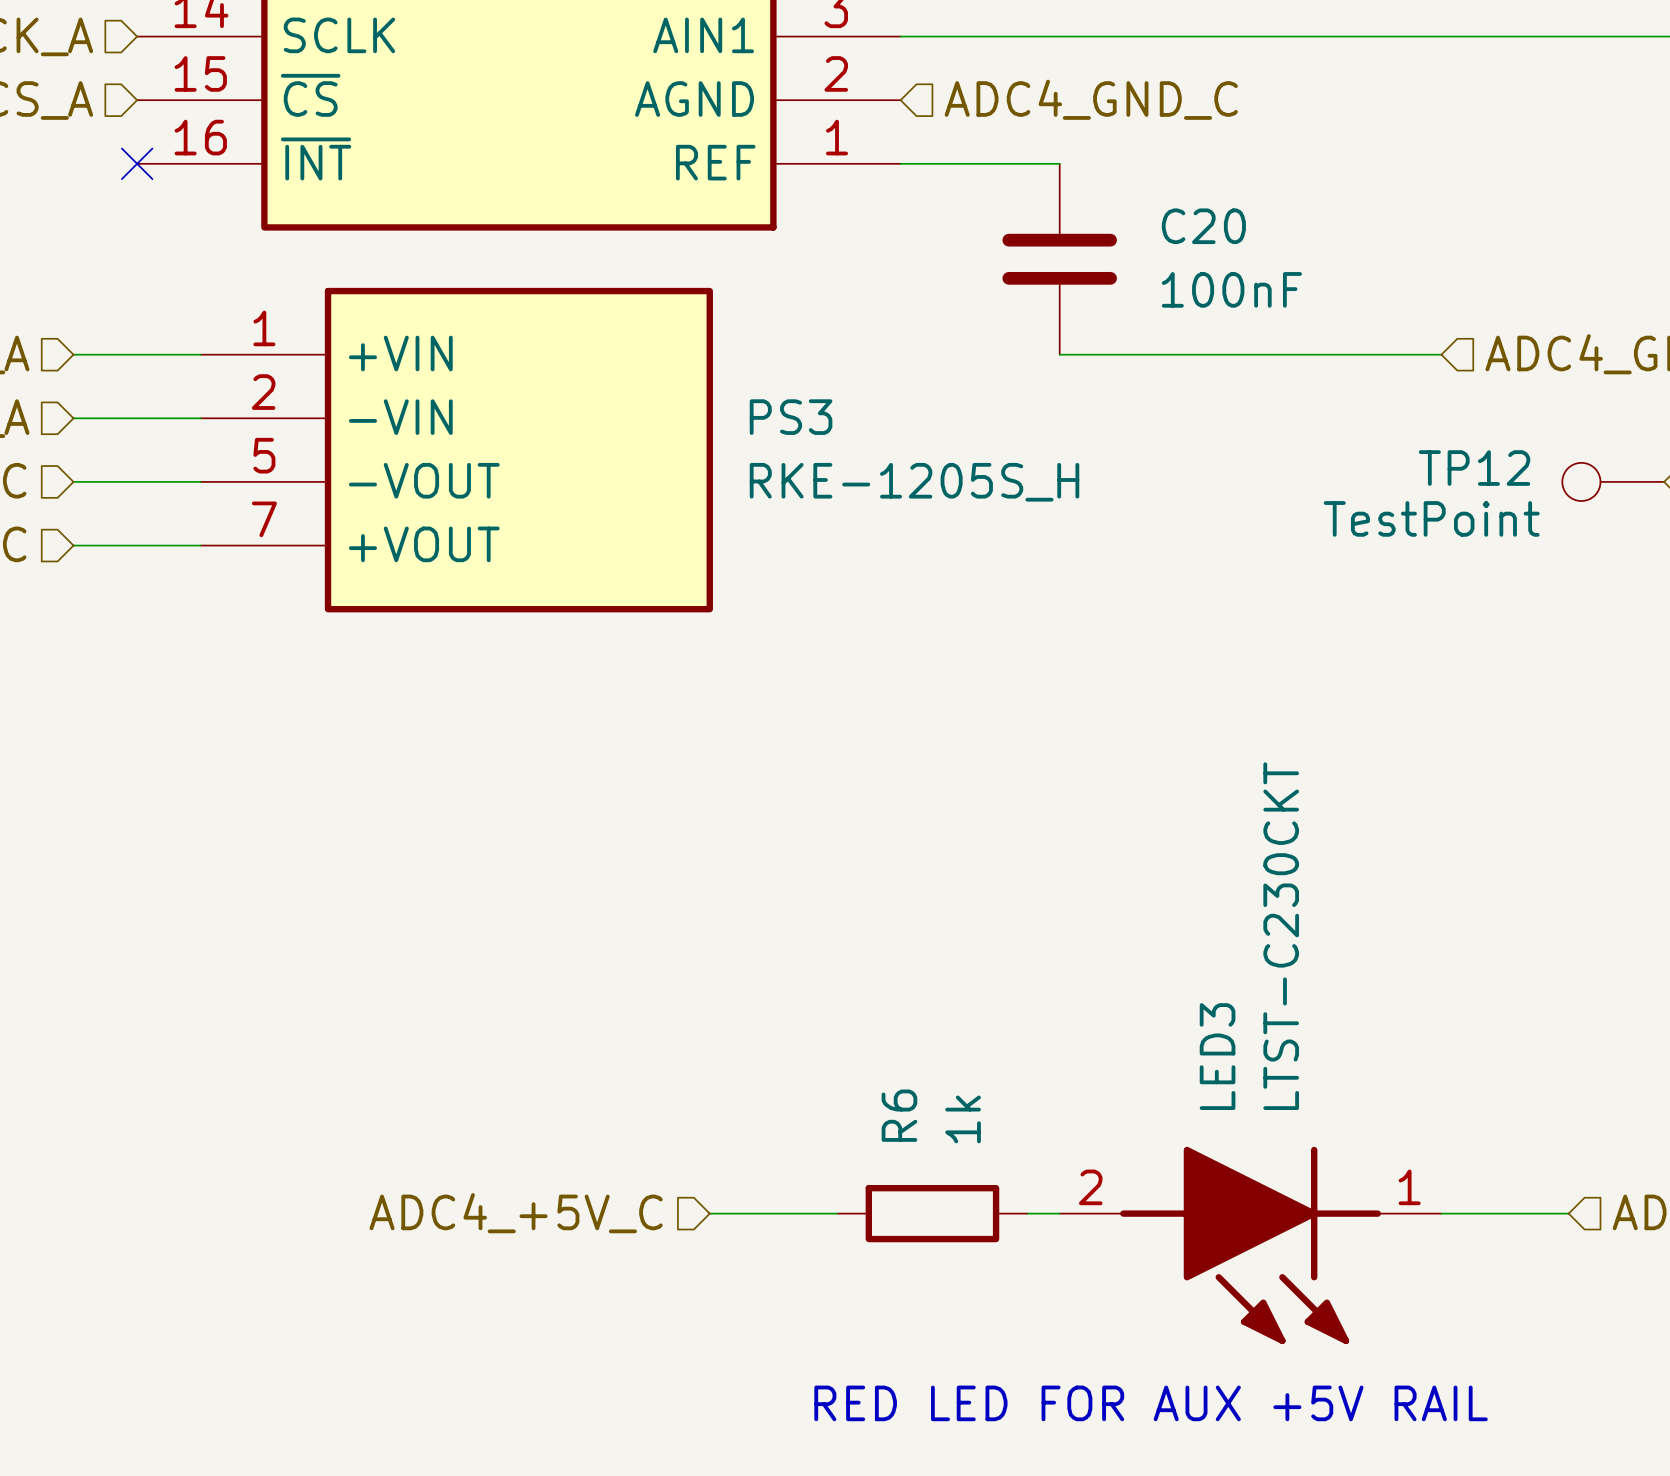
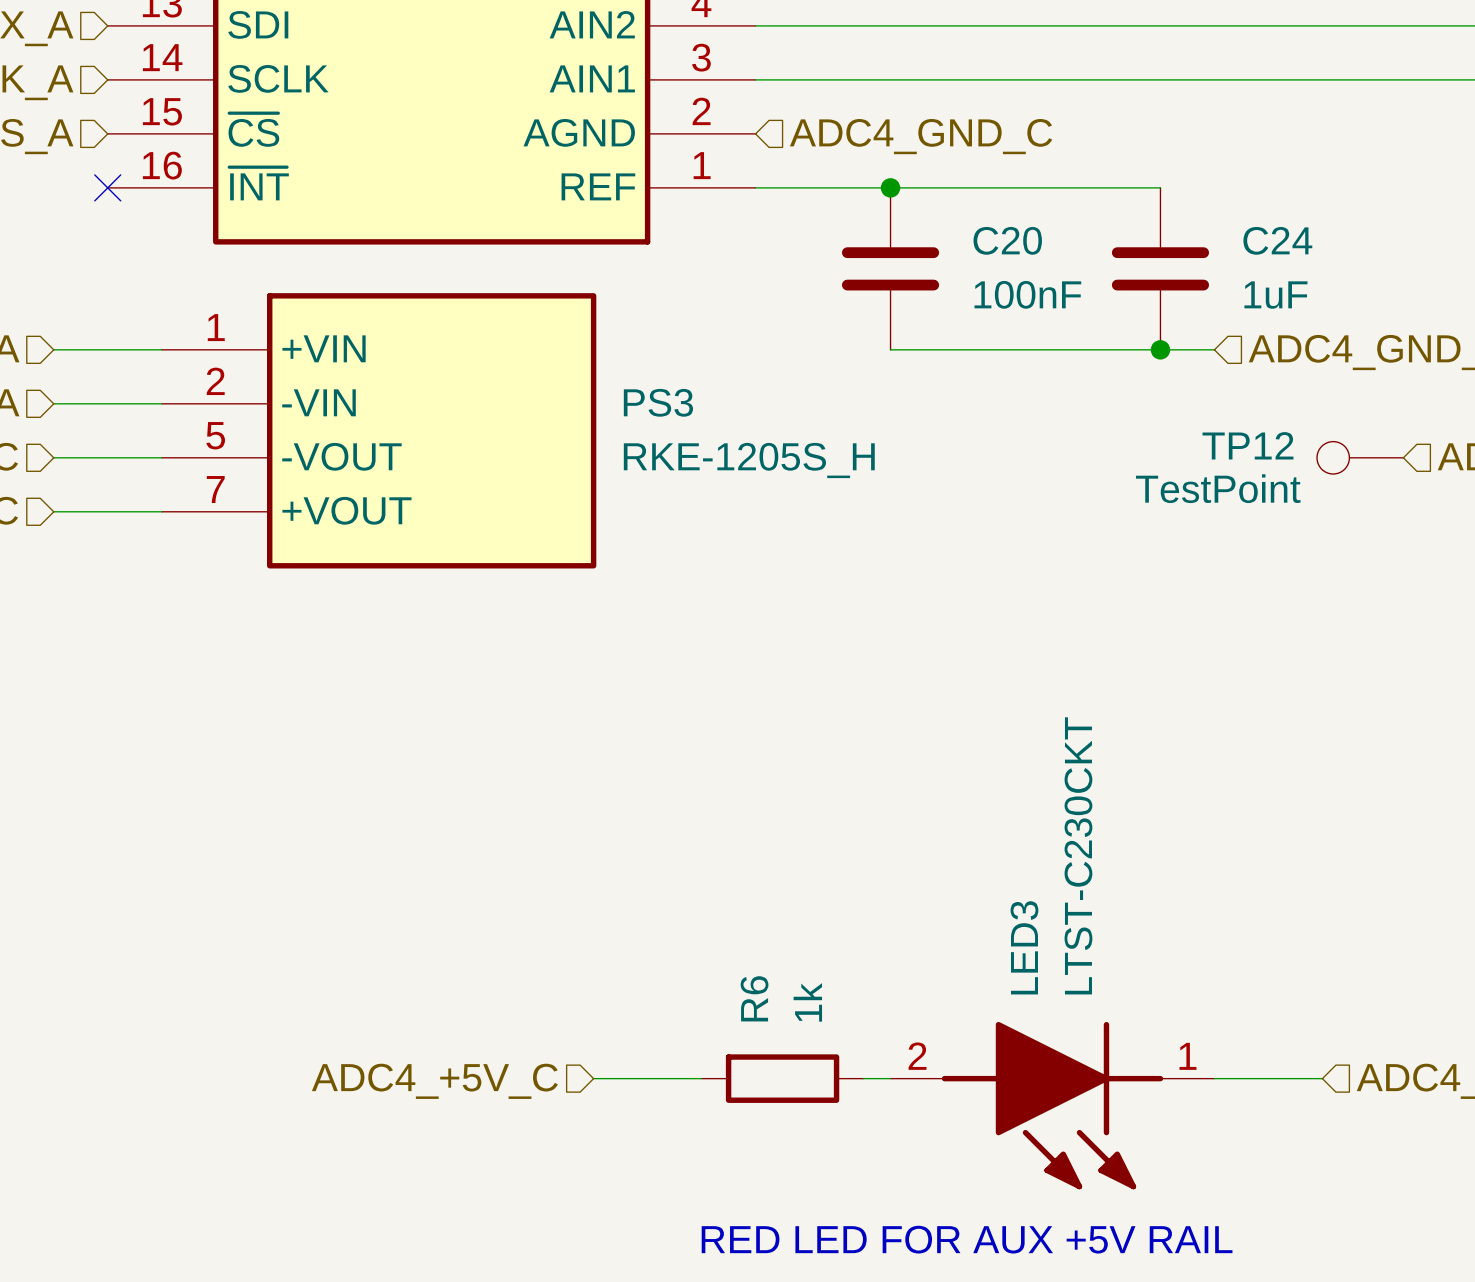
wire: none -> (890, 187) (1160, 187)
junction: none -> (890, 187)
C24: none -> 1uF (1160, 268)
junction: none -> (1160, 349)

